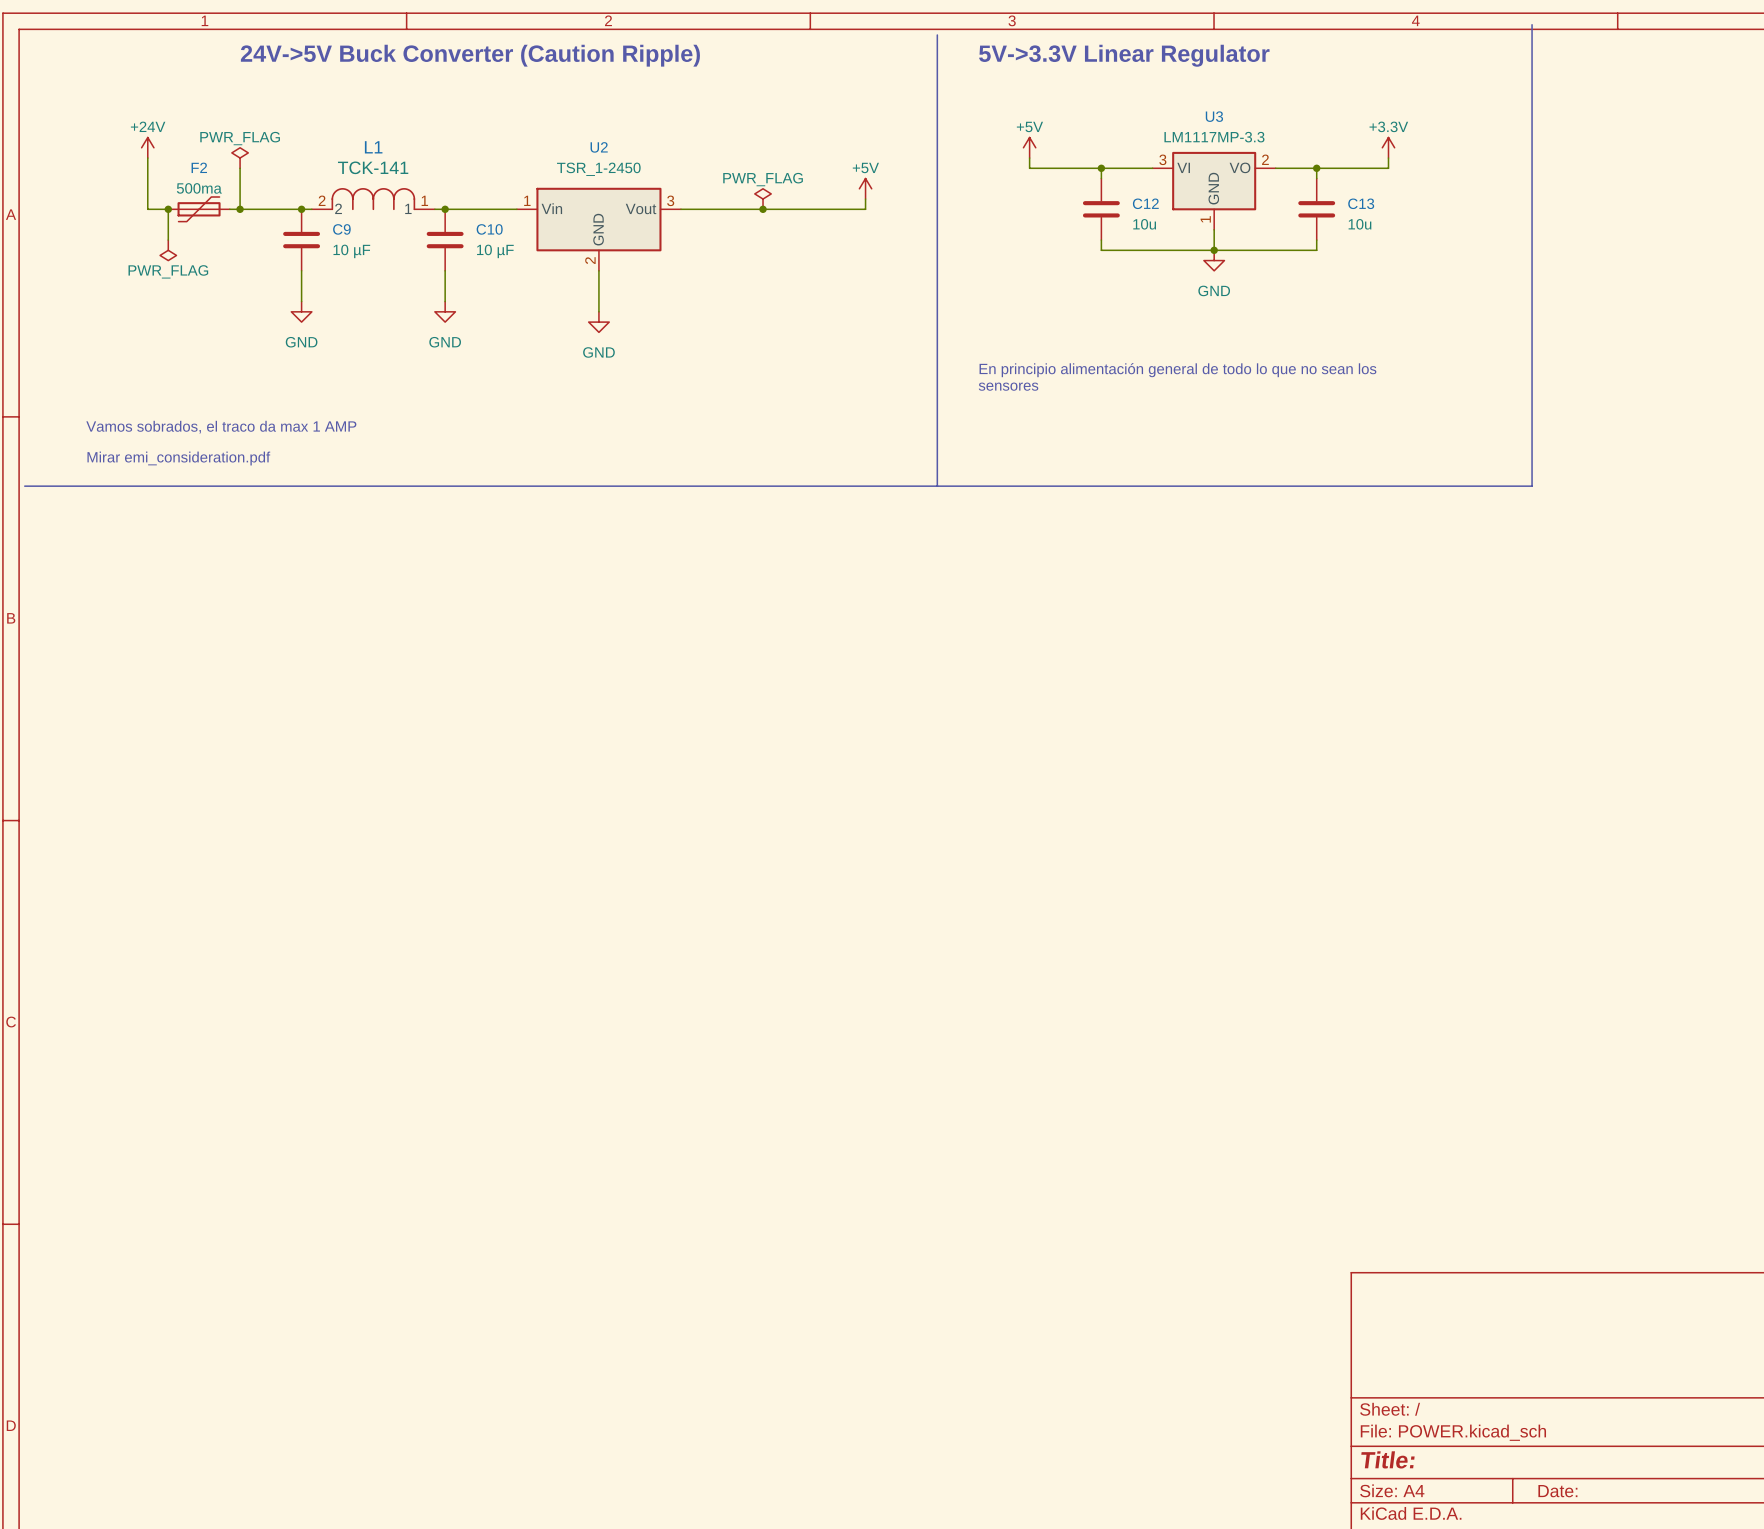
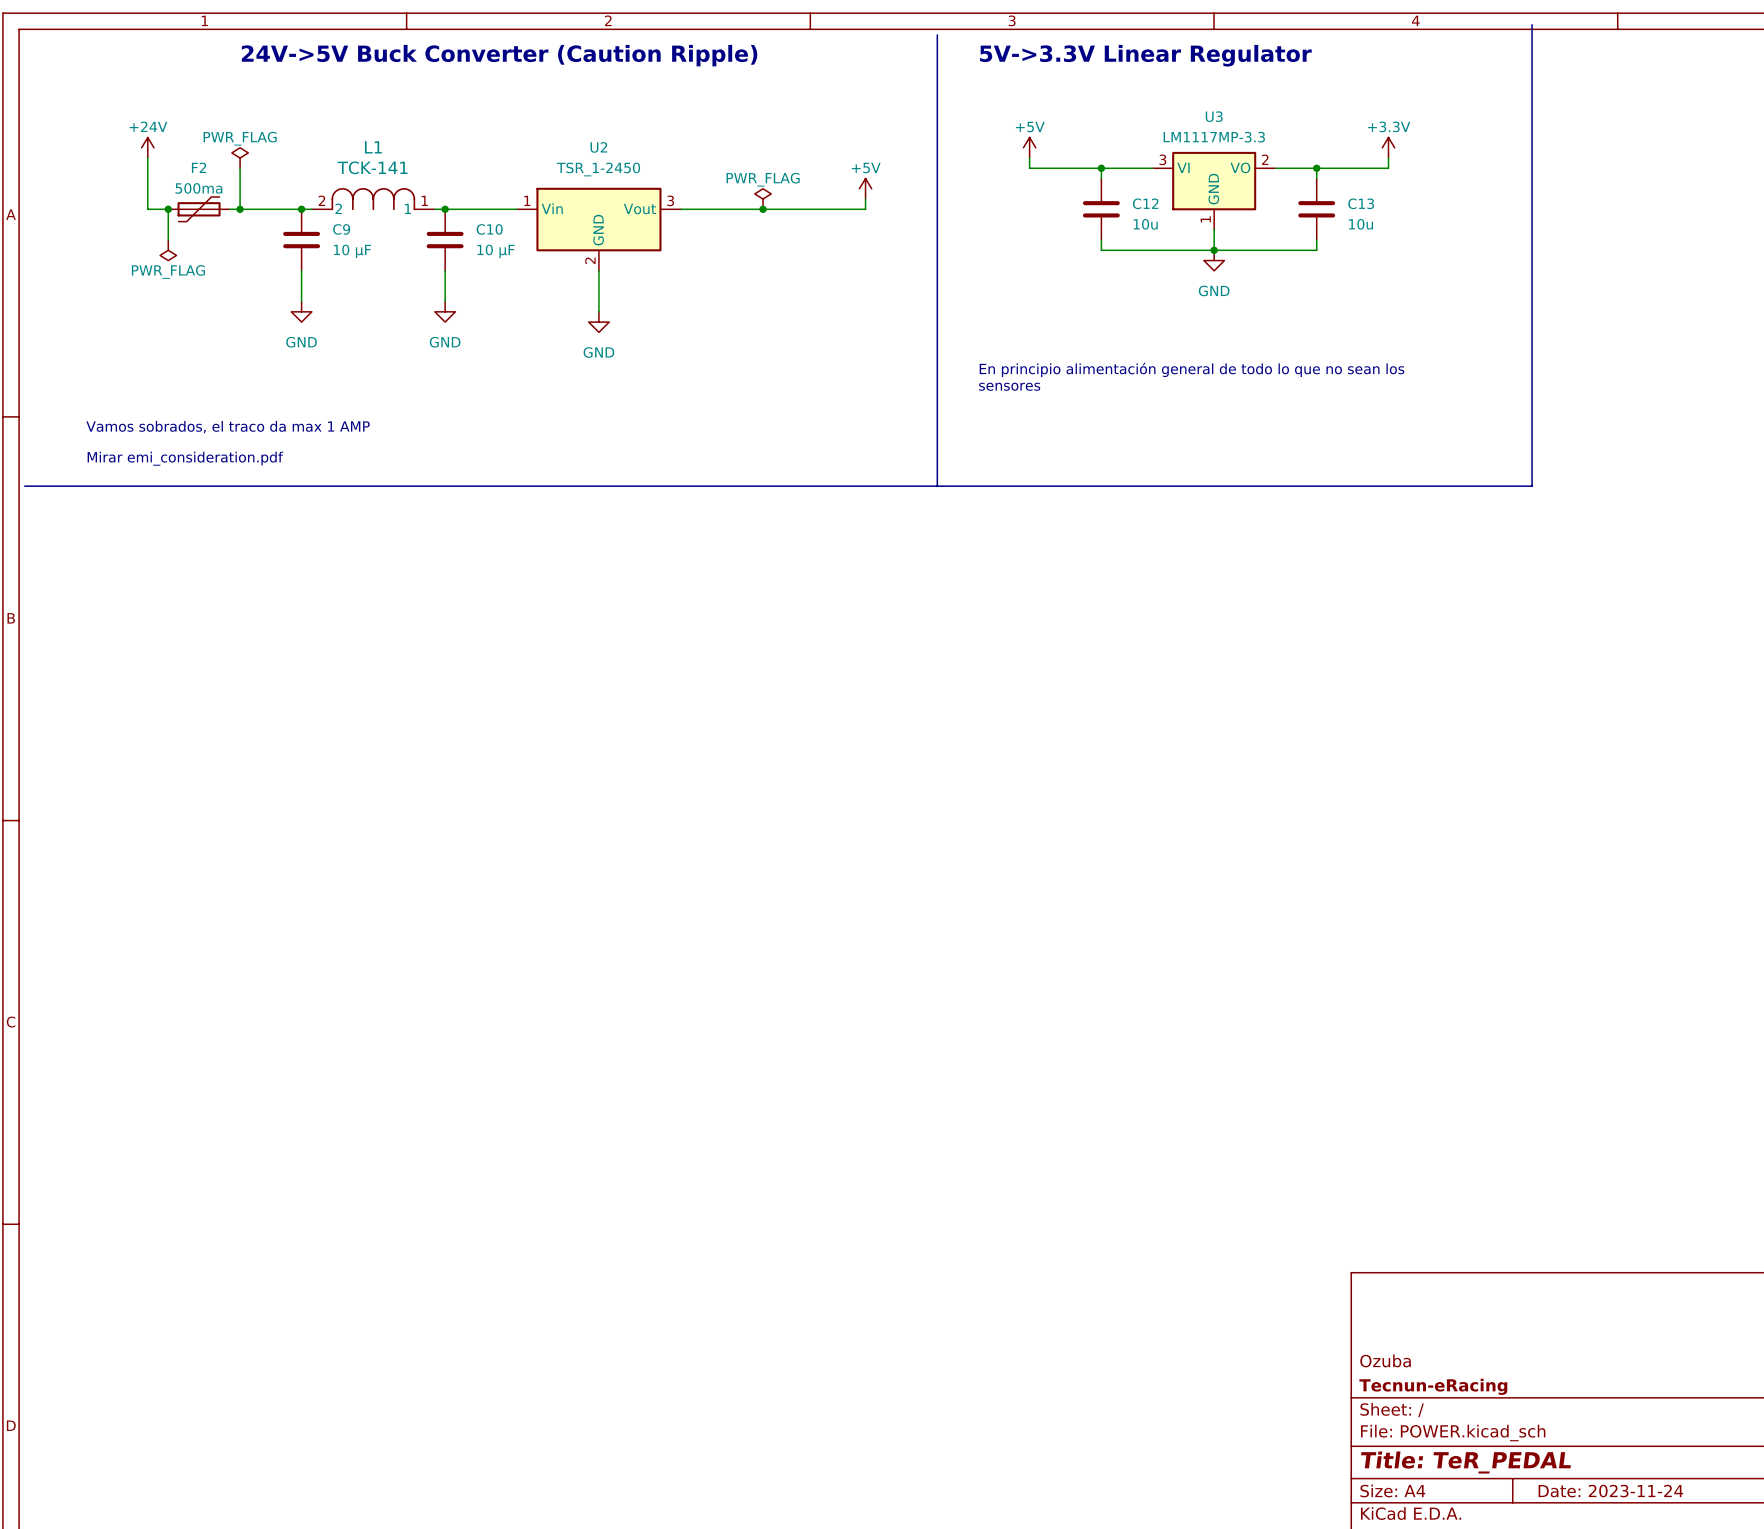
title block: none -> Ozuba (1385, 1360)
title block: none -> Tecnun-eRacing (1433, 1386)
title block: Title: (1387, 1459) -> Title: TeR_PEDAL (1465, 1462)
title block: Date: (1557, 1491) -> Date: 2023-11-24 (1610, 1491)

